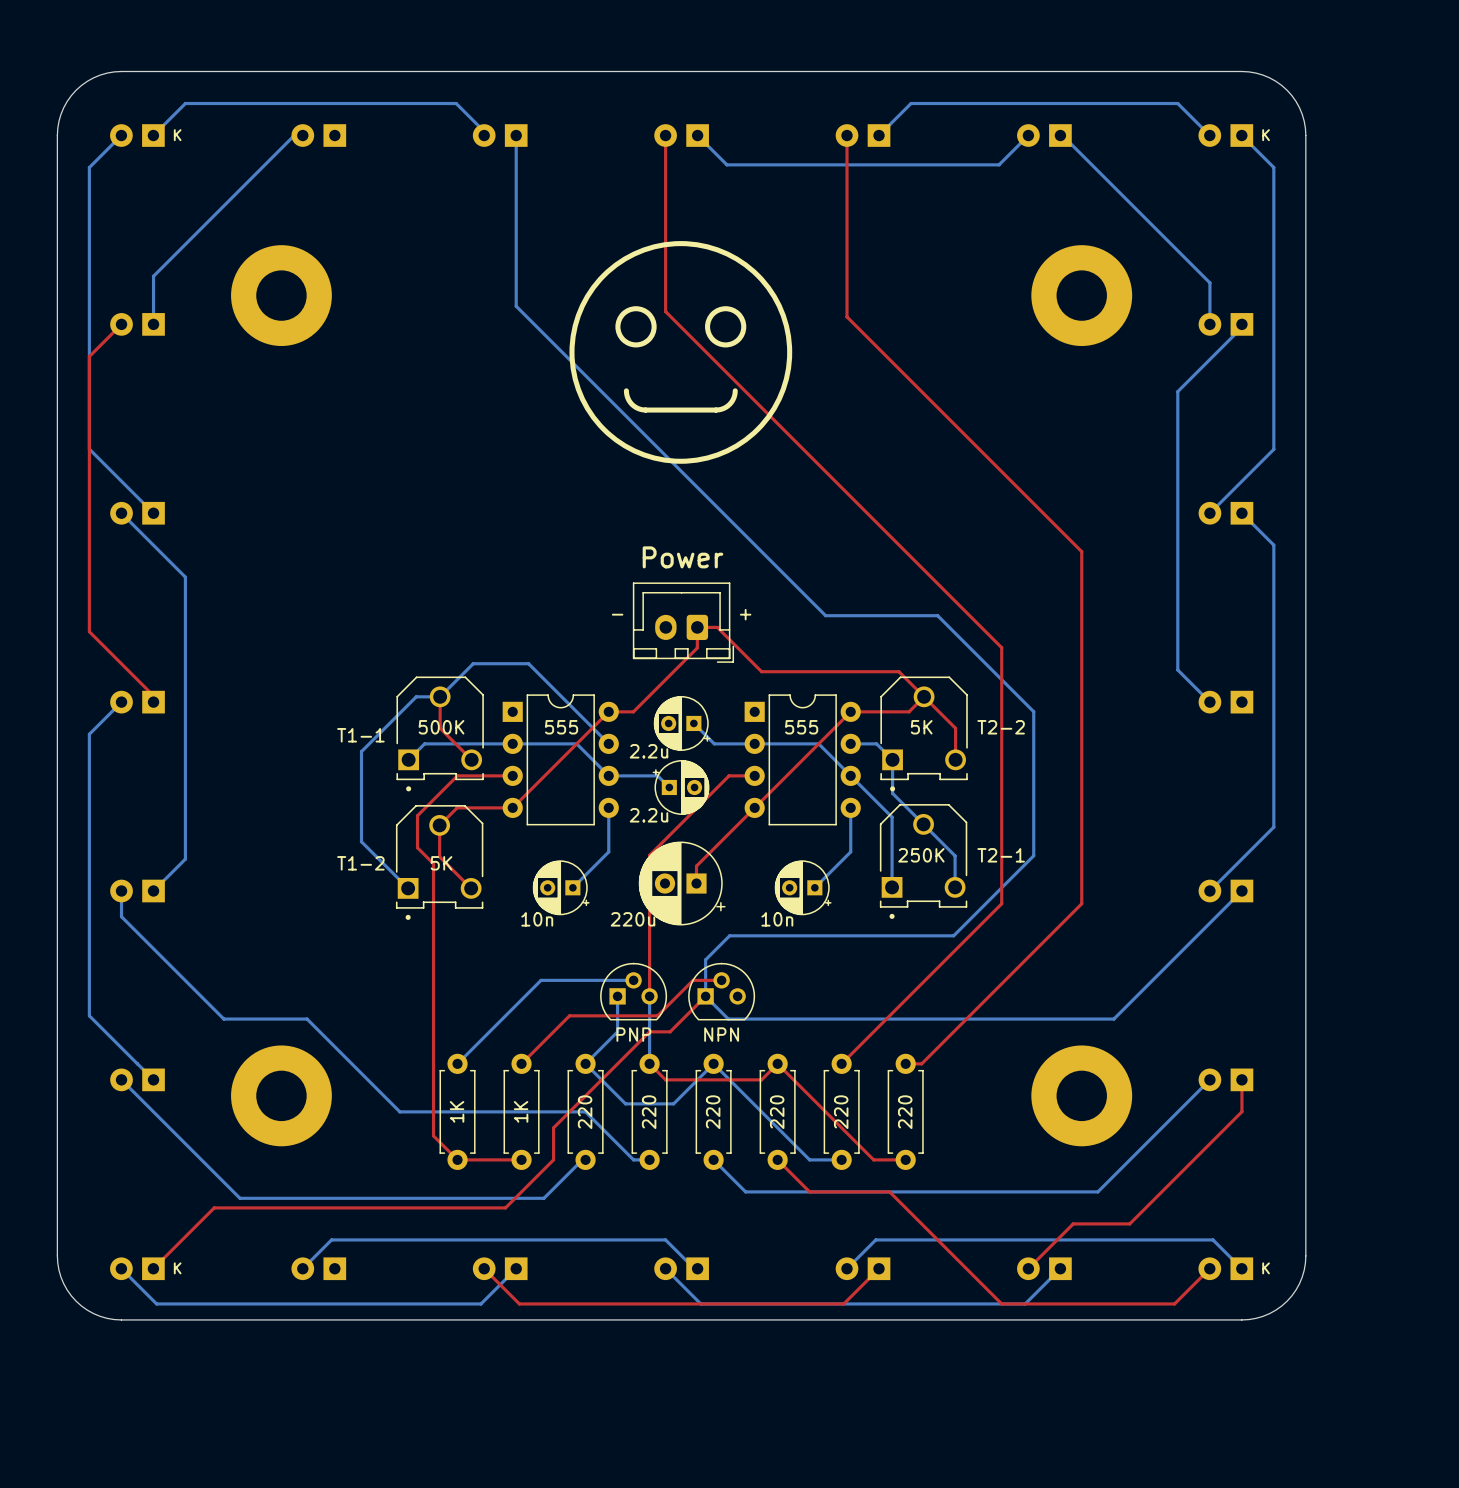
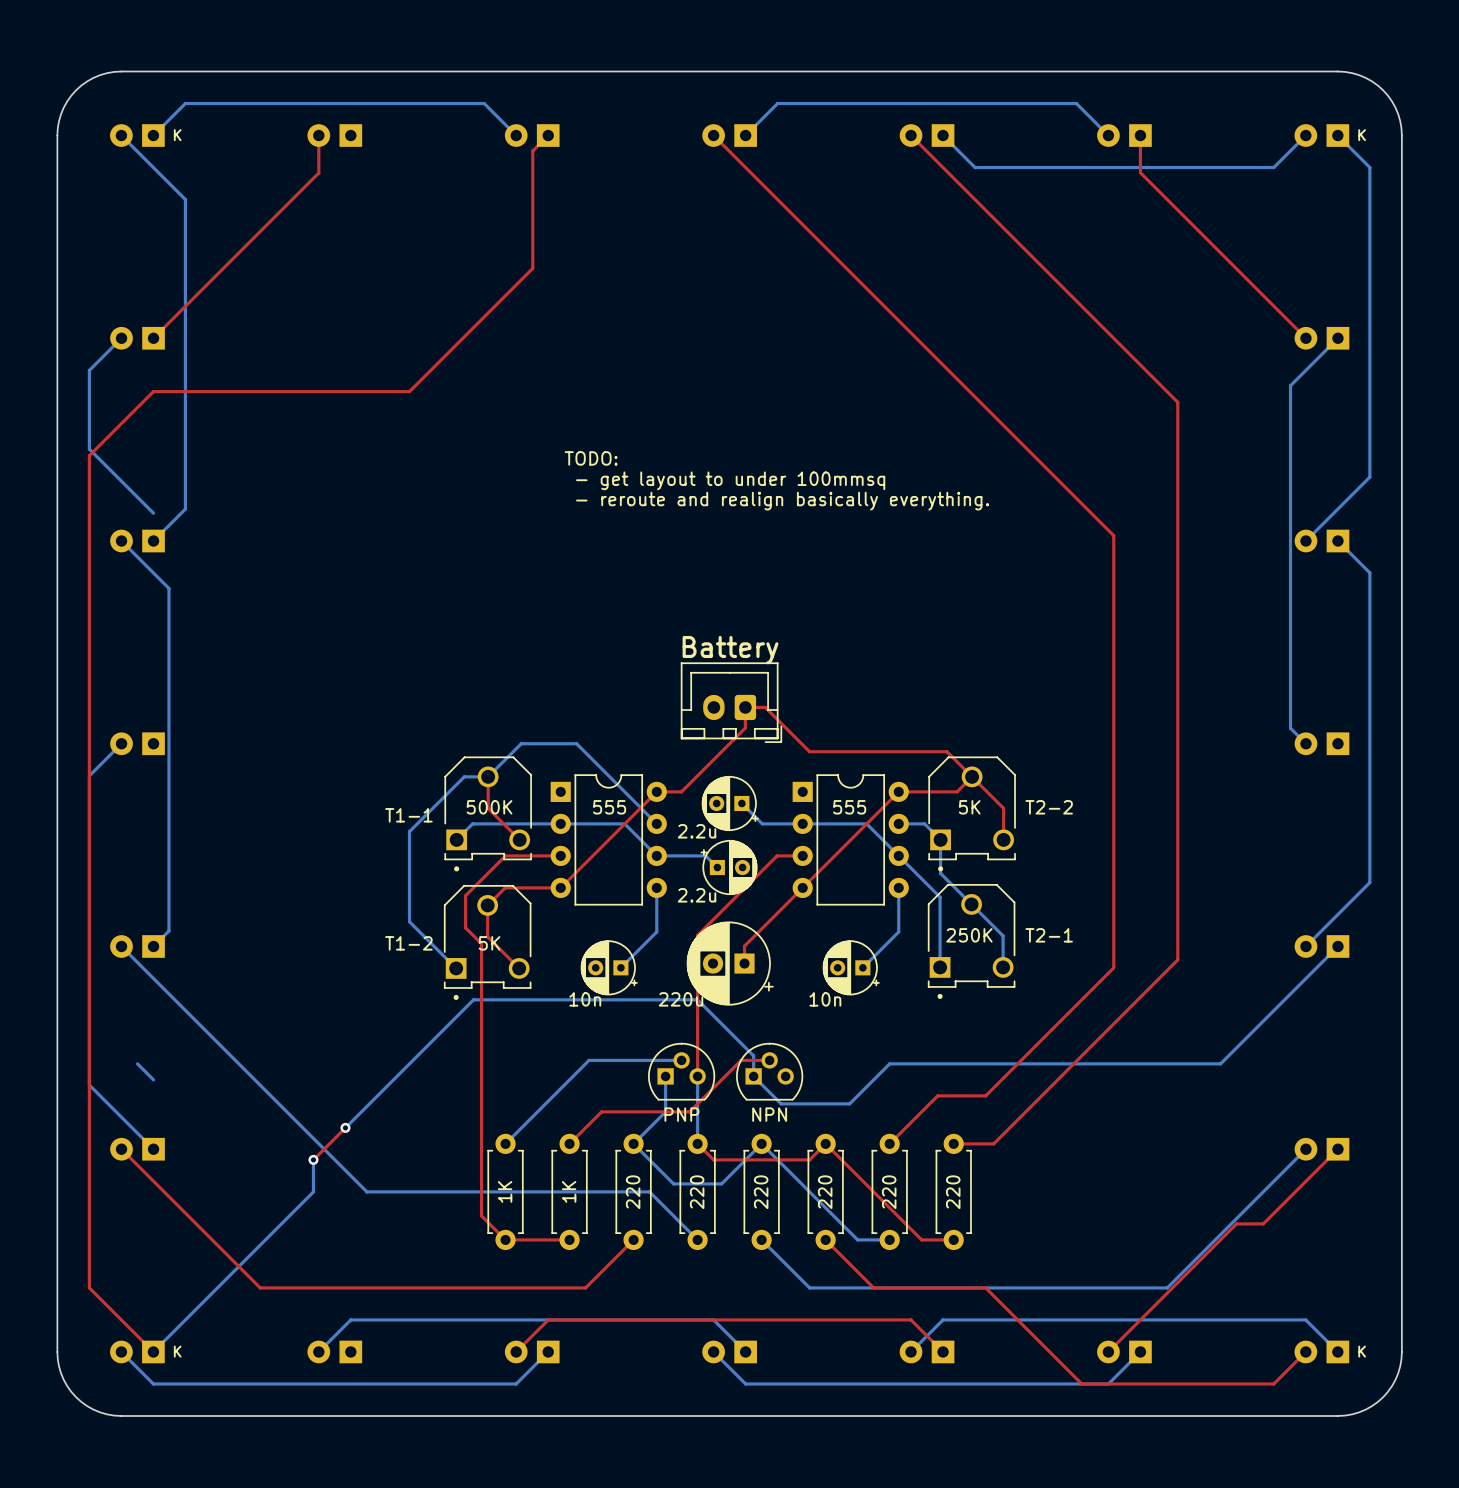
board edge: (1241, 71) (1256, 73) (1269, 77) (1287, 90) (1296, 101) (1302, 114) (1305, 135) (1305, 1255) (1304, 1270) (1299, 1283) (1287, 1301) (1269, 1313) (1256, 1318) (1241, 1319) (121, 1319) (107, 1318) (93, 1313) (76, 1301) (67, 1290) (60, 1277) (57, 1255) -> (1241, 71) (1337, 71) (1359, 75) (1377, 85) (1387, 95) (1395, 107) (1401, 128) (1401, 1351) (1398, 1373) (1392, 1386) (1383, 1397) (1371, 1406) (1359, 1412) (1337, 1416) (114, 1415) (100, 1412) (81, 1402) (71, 1391) (60, 1373) (57, 1351) (57, 1255)
bottom track: (456, 103) (484, 131) (484, 135) -> (456, 103) (484, 103) (516, 135)
bottom track: (911, 103) (879, 135) -> (911, 103) (777, 103) (745, 135)
bottom track: (1076, 103) (1177, 103) (1209, 135) -> (1076, 103) (1108, 135)
bottom track: (121, 135) (89, 167) (89, 370) -> (121, 135) (185, 199) (185, 509) (153, 541)
bottom track: (302, 135) (294, 135) (153, 276) (153, 324) -> none
top track: none -> (318, 135) (318, 172) (153, 338)
part position: (318, 135) -> (334, 135)
part position: (500, 135) -> (532, 135)
bottom track: (516, 135) (516, 306) (825, 615) (937, 615) (1033, 711) (1033, 855) (953, 935) (729, 935) (705, 959) (705, 996) (728, 1019) (1113, 1019) (1241, 891) -> none
top track: (665, 135) (665, 311) (1001, 647) (1001, 903) (841, 1063) -> none
part position: (681, 135) -> (729, 135)
bottom track: (697, 135) (726, 164) (999, 164) (1028, 135) -> none
top track: none -> (713, 135) (1113, 535) (1113, 967) (985, 1095) (937, 1095) (889, 1143)
top track: (847, 135) (847, 316) (1081, 551) (1081, 903) (921, 1063) (905, 1063) -> none
part: (863, 135) -> none
top track: none -> (911, 135) (1177, 402) (1177, 959) (993, 1143) (953, 1143)
part: none -> (927, 135)
bottom track: none -> (943, 135) (975, 167) (1273, 167) (1305, 135)
part: (1044, 135) -> none
bottom track: (1060, 135) (1209, 282) (1209, 324) -> none
part: none -> (1124, 135)
top track: none -> (1140, 135) (1140, 172) (1305, 338)
part position: (1225, 135) -> (1321, 135)
bottom track: (1241, 135) (1273, 167) (1273, 449) (1209, 513) -> none
bottom track: none -> (1337, 135) (1369, 167) (1369, 477) (1305, 541)
drawing: [569, 241, 793, 464] -> none
part: (281, 295) -> none
part: (1081, 295) -> none
top track: (121, 324) (89, 356) (89, 455) -> (548, 135) (532, 150) (532, 268) (409, 391) (153, 391) (89, 455)
part position: (137, 324) -> (137, 338)
part position: (1225, 324) -> (1321, 338)
bottom track: (1241, 324) (1241, 327) (1177, 391) (1177, 669) (1209, 702) -> none
bottom track: none -> (121, 338) (89, 370)
bottom track: none -> (1337, 338) (1290, 385) (1290, 728) (1305, 743)
line: (626, 390) (632, 404) (645, 410) (721, 409) (731, 402) (735, 390) -> none
text: none -> TODO: (591, 458)
text: none -> - get layout to under 100mmsq (730, 480)
text: none -> - reroute and realign basically everything. (782, 501)
bottom track: (121, 513) (185, 577) (185, 859) (153, 891) -> none
part position: (137, 513) -> (137, 541)
part: (1225, 513) -> none
bottom track: (1241, 513) (1273, 545) (1273, 827) (1209, 891) -> none
bottom track: none -> (121, 541) (168, 588) (168, 931) (153, 946)
part: none -> (1321, 541)
bottom track: none -> (1337, 541) (1369, 572) (1369, 882) (1305, 946)
part: Power (683, 622) -> none
top track: (89, 631) (153, 695) (153, 702) -> (89, 631) (89, 1287) (153, 1351)
top track: (440, 696) (440, 728) (471, 759) -> (488, 776) (488, 808) (519, 839)
top track: (924, 696) (909, 711) (850, 711) (696, 866) (696, 883) -> (972, 776) (957, 791) (898, 791) (744, 946) (744, 963)
bottom track: (121, 702) (89, 734) (89, 775) -> (121, 743) (89, 775)
part position: (137, 702) -> (137, 743)
part: none -> Battery (731, 702)
part: (1225, 702) -> none
part: 2.2u (682, 723) -> none
bottom track: (693, 723) (714, 743) (818, 743) (892, 817) (892, 887) -> (741, 803) (762, 823) (866, 823) (940, 897) (940, 967)
part position: (440, 733) -> (488, 813)
part position: (924, 733) -> (972, 813)
bottom track: (576, 743) (424, 743) (408, 759) -> (576, 743) (521, 743) (488, 776) (464, 776) (409, 831) (409, 921) (456, 968)
bottom track: (608, 743) (528, 663) (473, 663) (440, 696) (416, 696) (361, 751) (361, 841) (408, 888) -> none
bottom track: (850, 743) (876, 743) (892, 759) (892, 793) (955, 855) (955, 887) -> (898, 823) (924, 823) (940, 839) (940, 873) (1003, 935) (1003, 967)
part: none -> (1321, 743)
part position: (560, 759) -> (608, 839)
part position: (802, 759) -> (850, 839)
top track: (955, 759) (955, 728) (898, 671) (761, 671) (717, 627) (697, 627) (697, 647) (633, 711) (608, 711) (512, 807) (457, 807) (439, 825) (439, 856) (471, 888) -> (1003, 839) (1003, 808) (946, 751) (809, 751) (765, 707) (745, 707) (745, 727) (681, 791) (656, 791) (560, 887) (505, 887) (487, 905) (487, 936) (519, 968)
top track: (512, 775) (457, 775) (417, 815) (417, 847) (433, 863) (433, 1135) (457, 1159) (521, 1159) -> (560, 855) (505, 855) (465, 895) (465, 927) (481, 943) (481, 1215) (505, 1239) (569, 1239)
bottom track: (608, 775) (657, 775) (669, 787) -> (608, 775) (656, 823)
top track: (754, 775) (729, 775) (649, 855) (649, 996) -> (802, 855) (777, 855) (697, 935) (697, 1076)
part: 2.2u (681, 787) -> none
part: none -> 2.2u (730, 803)
bottom track: (608, 807) (608, 851) (572, 887) -> (656, 887) (656, 931) (620, 967)
bottom track: (850, 807) (850, 851) (814, 887) -> (898, 887) (898, 931) (862, 967)
bottom track: none -> (456, 839) (472, 823) (624, 823) (656, 855) (705, 855) (717, 867)
part position: (923, 861) -> (971, 941)
part position: (439, 862) -> (487, 942)
part: none -> 2.2u (729, 867)
part position: (682, 883) -> (730, 963)
part position: (561, 887) -> (609, 967)
part position: (803, 887) -> (851, 967)
bottom track: (121, 891) (121, 916) (223, 1019) (307, 1019) (399, 1111) (585, 1111) (633, 1159) (649, 1159) -> none
part position: (137, 891) -> (137, 946)
part: (1225, 891) -> none
bottom track: none -> (121, 946) (366, 1191) (649, 1191) (697, 1239)
part: none -> (1321, 946)
bottom track: none -> (1337, 946) (1220, 1063) (889, 1063) (849, 1103) (781, 1103) (753, 1076) (753, 1055) (697, 999) (473, 999) (345, 1127)
bottom track: (633, 980) (541, 980) (457, 1063) -> none
top track: (721, 980) (693, 980) (657, 1015) (569, 1015) (521, 1063) -> none
part position: (633, 991) -> (681, 1071)
part position: (721, 991) -> (769, 1071)
bottom track: (617, 996) (617, 1031) (589, 1060) -> (681, 1060) (589, 1060)
bottom track: (649, 996) (649, 1063) -> (697, 1076) (697, 1143)
top track: (705, 996) (670, 1031) (649, 1031) (553, 1127) (553, 1159) (505, 1207) (214, 1207) (153, 1268) -> none
bottom track: (89, 1015) (137, 1063) -> (89, 1015) (89, 1085) (153, 1149)
top track: none -> (769, 1060) (741, 1060) (689, 1111) (601, 1111) (569, 1143)
bottom track: (585, 1063) (625, 1103) (673, 1103) (713, 1063) (809, 1159) (841, 1159) -> (585, 1063) (505, 1143)
top track: (649, 1063) (665, 1079) (761, 1079) (777, 1063) (873, 1159) (905, 1159) -> (697, 1143) (713, 1159) (809, 1159) (825, 1143) (921, 1239) (953, 1239)
bottom track: (121, 1079) (239, 1198) (543, 1198) (582, 1159) (585, 1159) -> none
part: (137, 1079) -> none
bottom track: (1209, 1079) (1097, 1191) (745, 1191) (713, 1159) -> none
part: (1225, 1079) -> none
top track: (1241, 1079) (1241, 1111) (1129, 1223) (1073, 1223) (1028, 1268) -> none
part: (281, 1095) -> none
part: (1081, 1095) -> none
part: 1K (457, 1111) -> none
part: 1K (521, 1111) -> none
part: 220 (585, 1111) -> none
part: 220 (649, 1111) -> none
part: 220 (713, 1111) -> none
part: 220 (777, 1111) -> none
part: 220 (841, 1111) -> none
part: 220 (905, 1111) -> none
top track: none -> (345, 1127) (313, 1159)
via: none -> (345, 1127)
top track: none -> (121, 1149) (260, 1287) (585, 1287) (633, 1239)
part: none -> (137, 1149)
bottom track: none -> (1305, 1149) (1167, 1287) (809, 1287) (761, 1239)
part: none -> (1321, 1149)
top track: none -> (1337, 1149) (1263, 1223) (1236, 1223) (1108, 1351)
bottom track: none -> (313, 1159) (313, 1191) (153, 1351)
via: none -> (313, 1159)
top track: (777, 1159) (809, 1191) (889, 1191) (985, 1287) -> (825, 1239) (873, 1287) (985, 1287)
part: none -> 1K (505, 1191)
part: none -> 1K (569, 1191)
part: none -> 220 (633, 1191)
part: none -> 220 (697, 1191)
part: none -> 220 (761, 1191)
part: none -> 220 (825, 1191)
part: none -> 220 (889, 1191)
part: none -> 220 (953, 1191)
bottom track: (875, 1239) (847, 1268) -> (875, 1239) (857, 1239) (761, 1143) (721, 1183) (673, 1183) (633, 1143) (665, 1111) (665, 1076)
bottom track: (889, 1239) (1213, 1239) (1241, 1268) -> none
bottom track: (121, 1268) (156, 1303) (481, 1303) (516, 1268) -> none
part position: (137, 1268) -> (137, 1351)
bottom track: (302, 1268) (331, 1239) (665, 1239) (694, 1268) (697, 1268) -> none
part position: (318, 1268) -> (334, 1351)
top track: (484, 1268) (519, 1303) (843, 1303) (879, 1268) -> none
part: (500, 1268) -> none
bottom track: (665, 1268) (700, 1303) (1025, 1303) (1060, 1268) -> none
part: (681, 1268) -> none
part: (863, 1268) -> none
part: (1044, 1268) -> none
top track: (1209, 1268) (1174, 1303) (1001, 1303) -> (1305, 1351) (1273, 1383) (1081, 1383) (1001, 1303)
part position: (1225, 1268) -> (1321, 1351)
bottom track: none -> (121, 1351) (153, 1383) (516, 1383) (548, 1351)
bottom track: none -> (318, 1351) (350, 1319) (713, 1319) (745, 1351)
top track: none -> (516, 1351) (548, 1319) (911, 1319) (943, 1351)
part: none -> (532, 1351)
bottom track: none -> (713, 1351) (745, 1383) (1108, 1383) (1140, 1351)
part: none -> (729, 1351)
bottom track: none -> (911, 1351) (943, 1319) (1305, 1319) (1337, 1351)
part: none -> (927, 1351)
part: none -> (1124, 1351)

